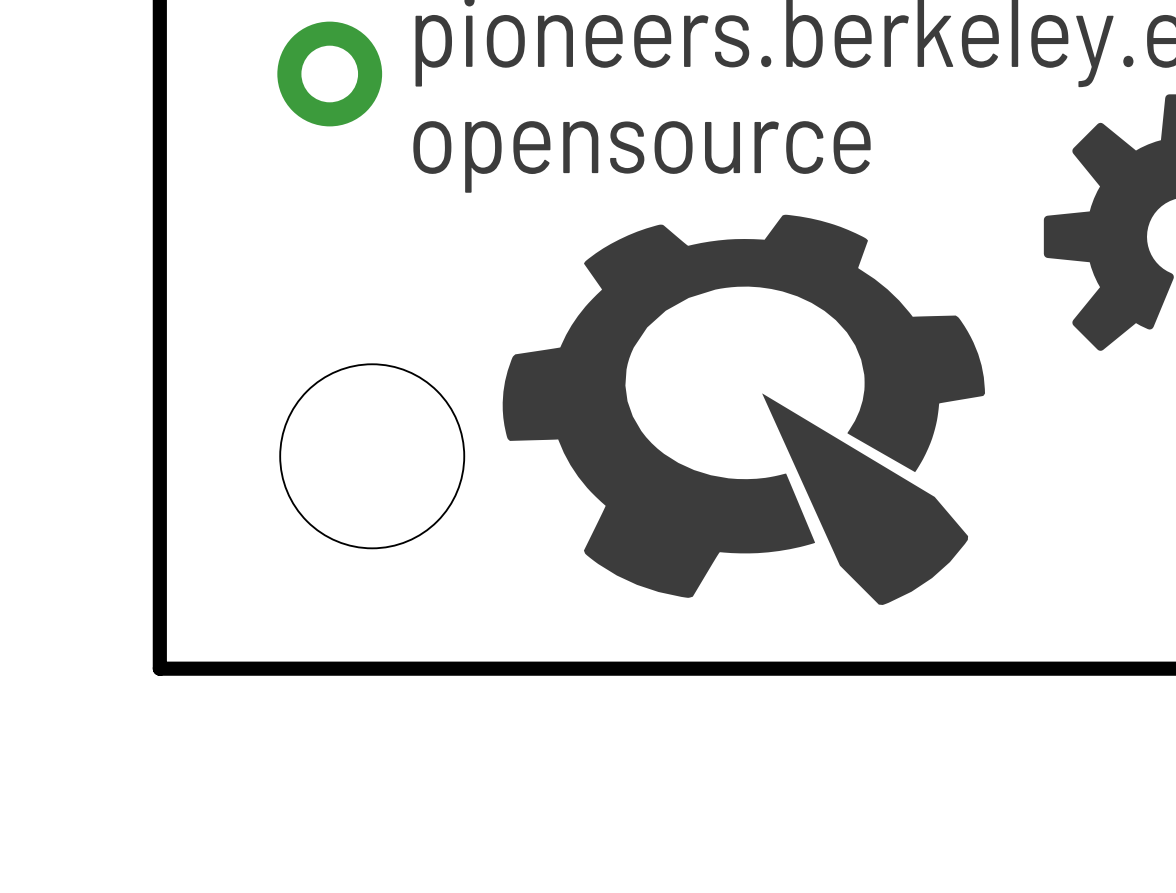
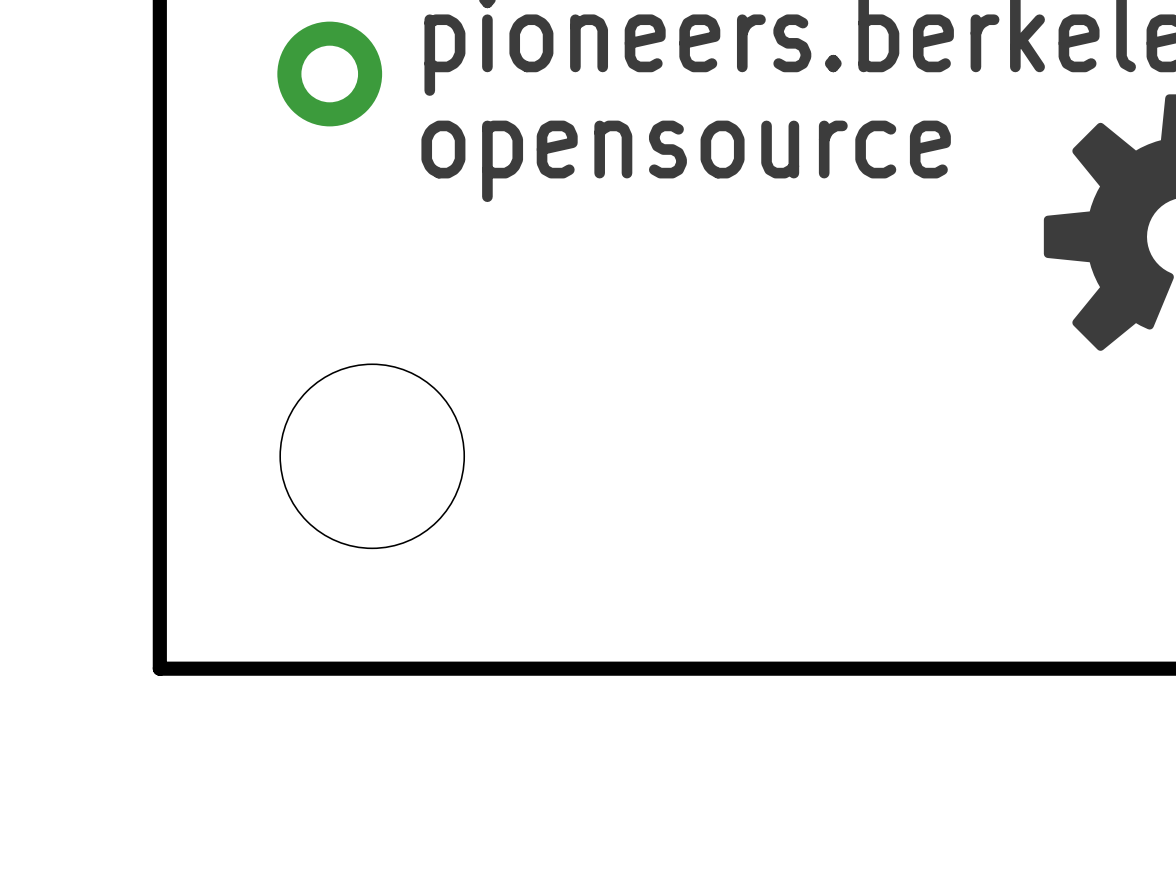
drawing: [502, 214, 986, 605] -> none

